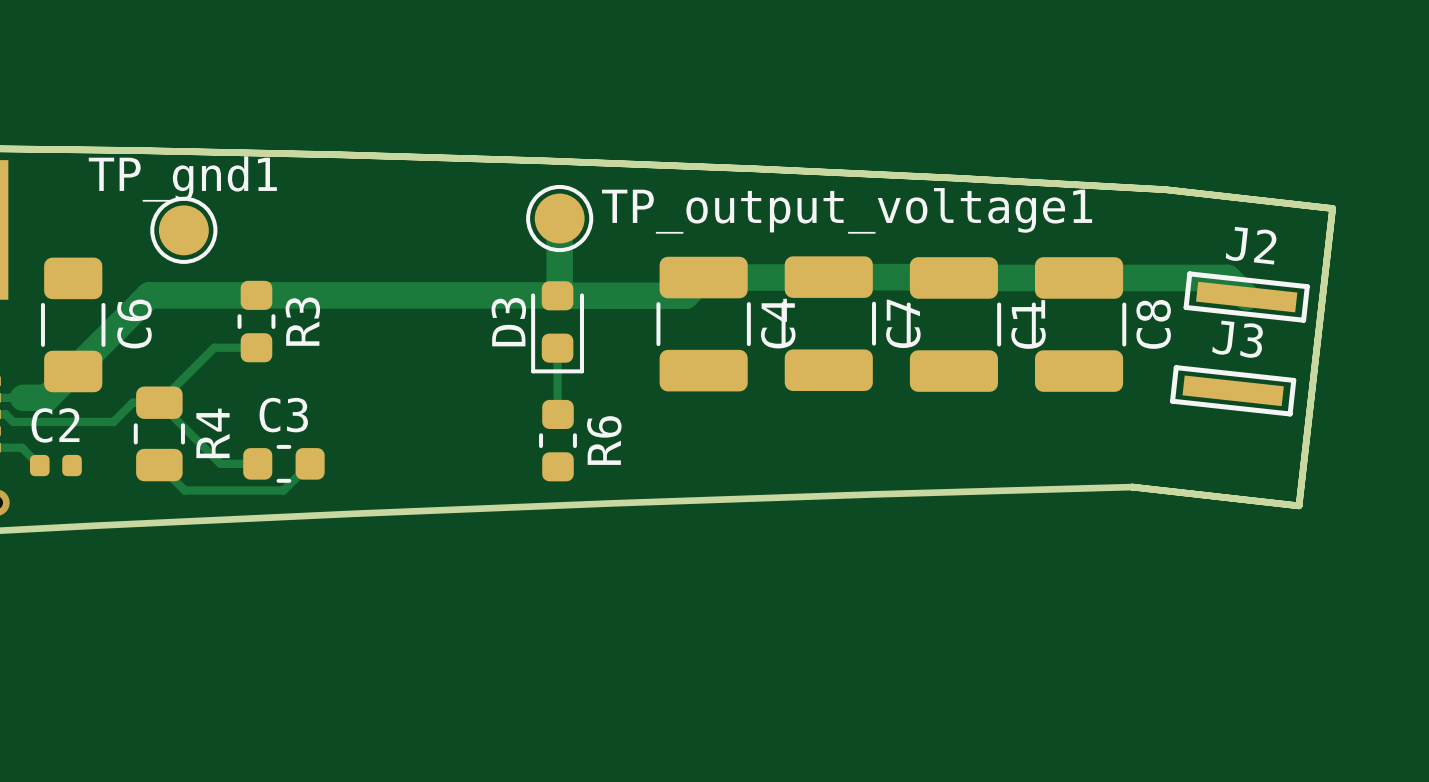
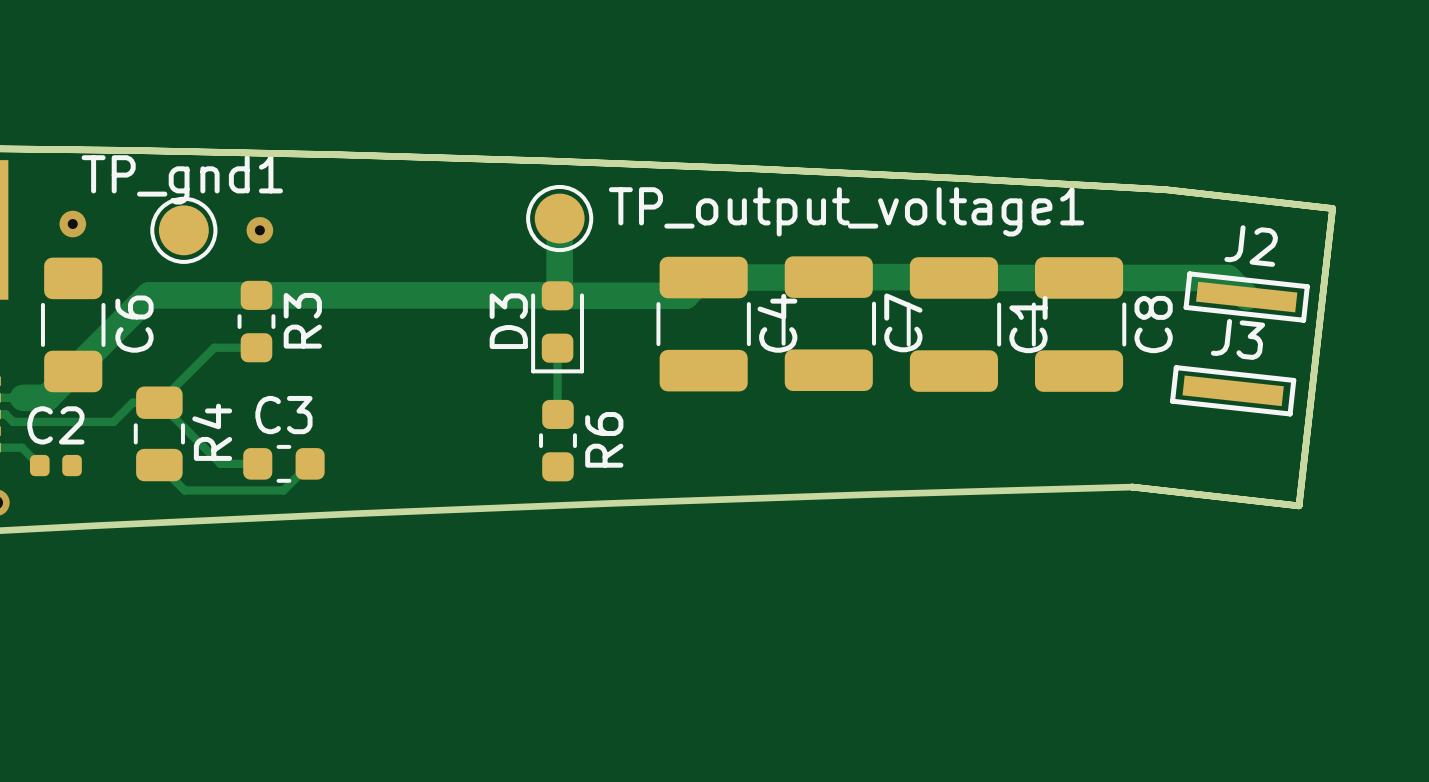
via: none -> (72, 224)
via: none -> (259, 230)

